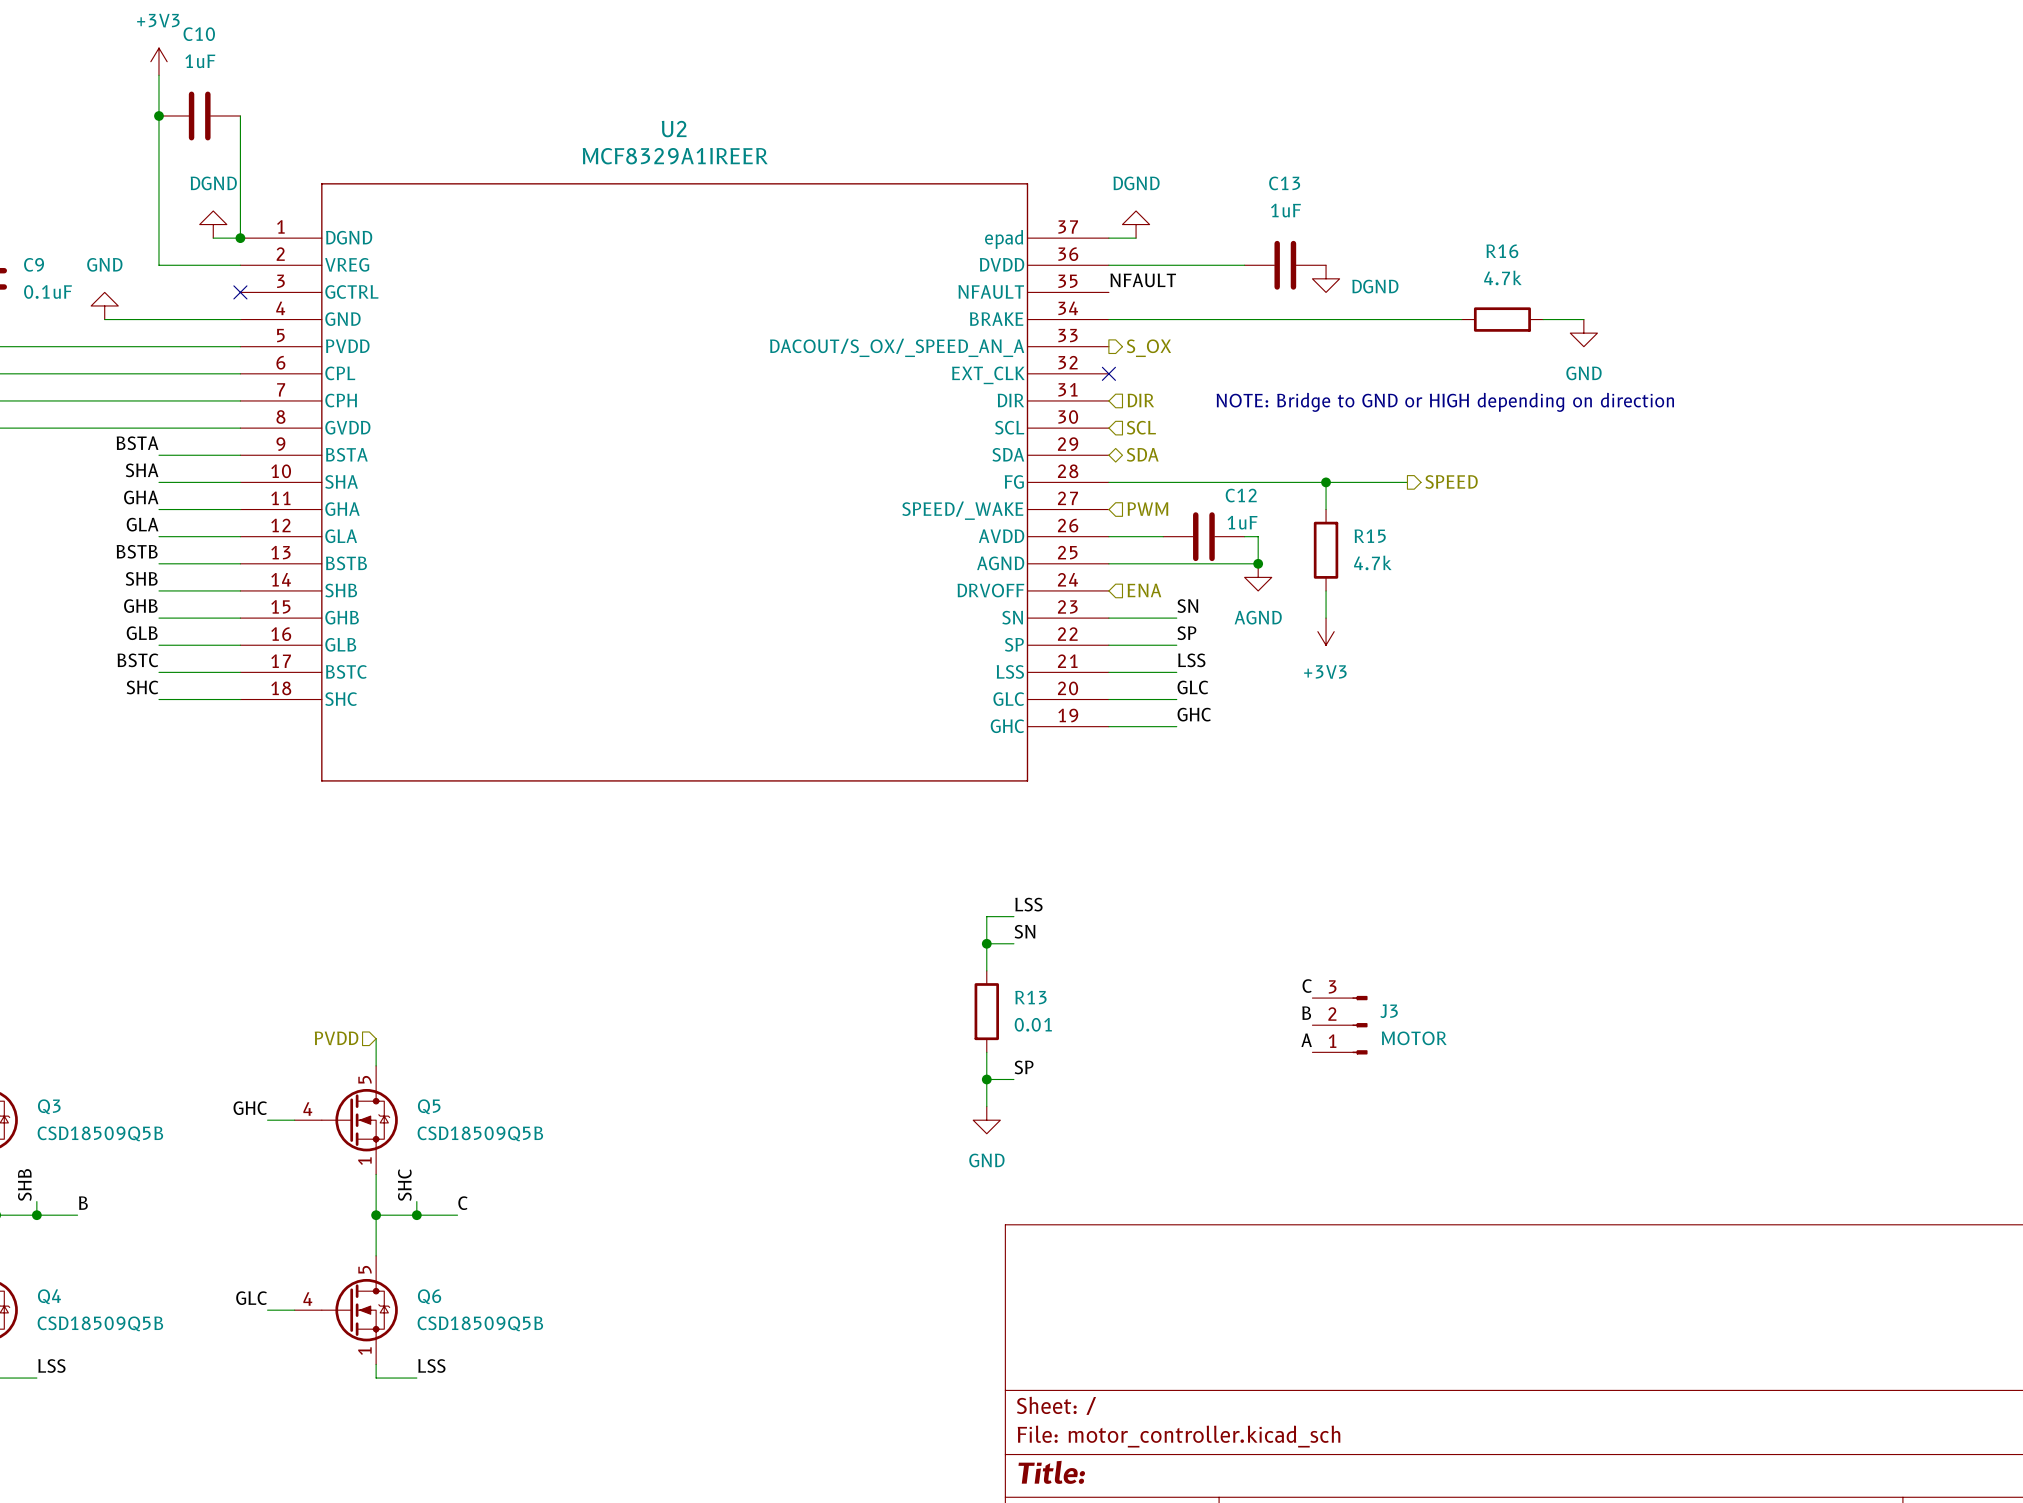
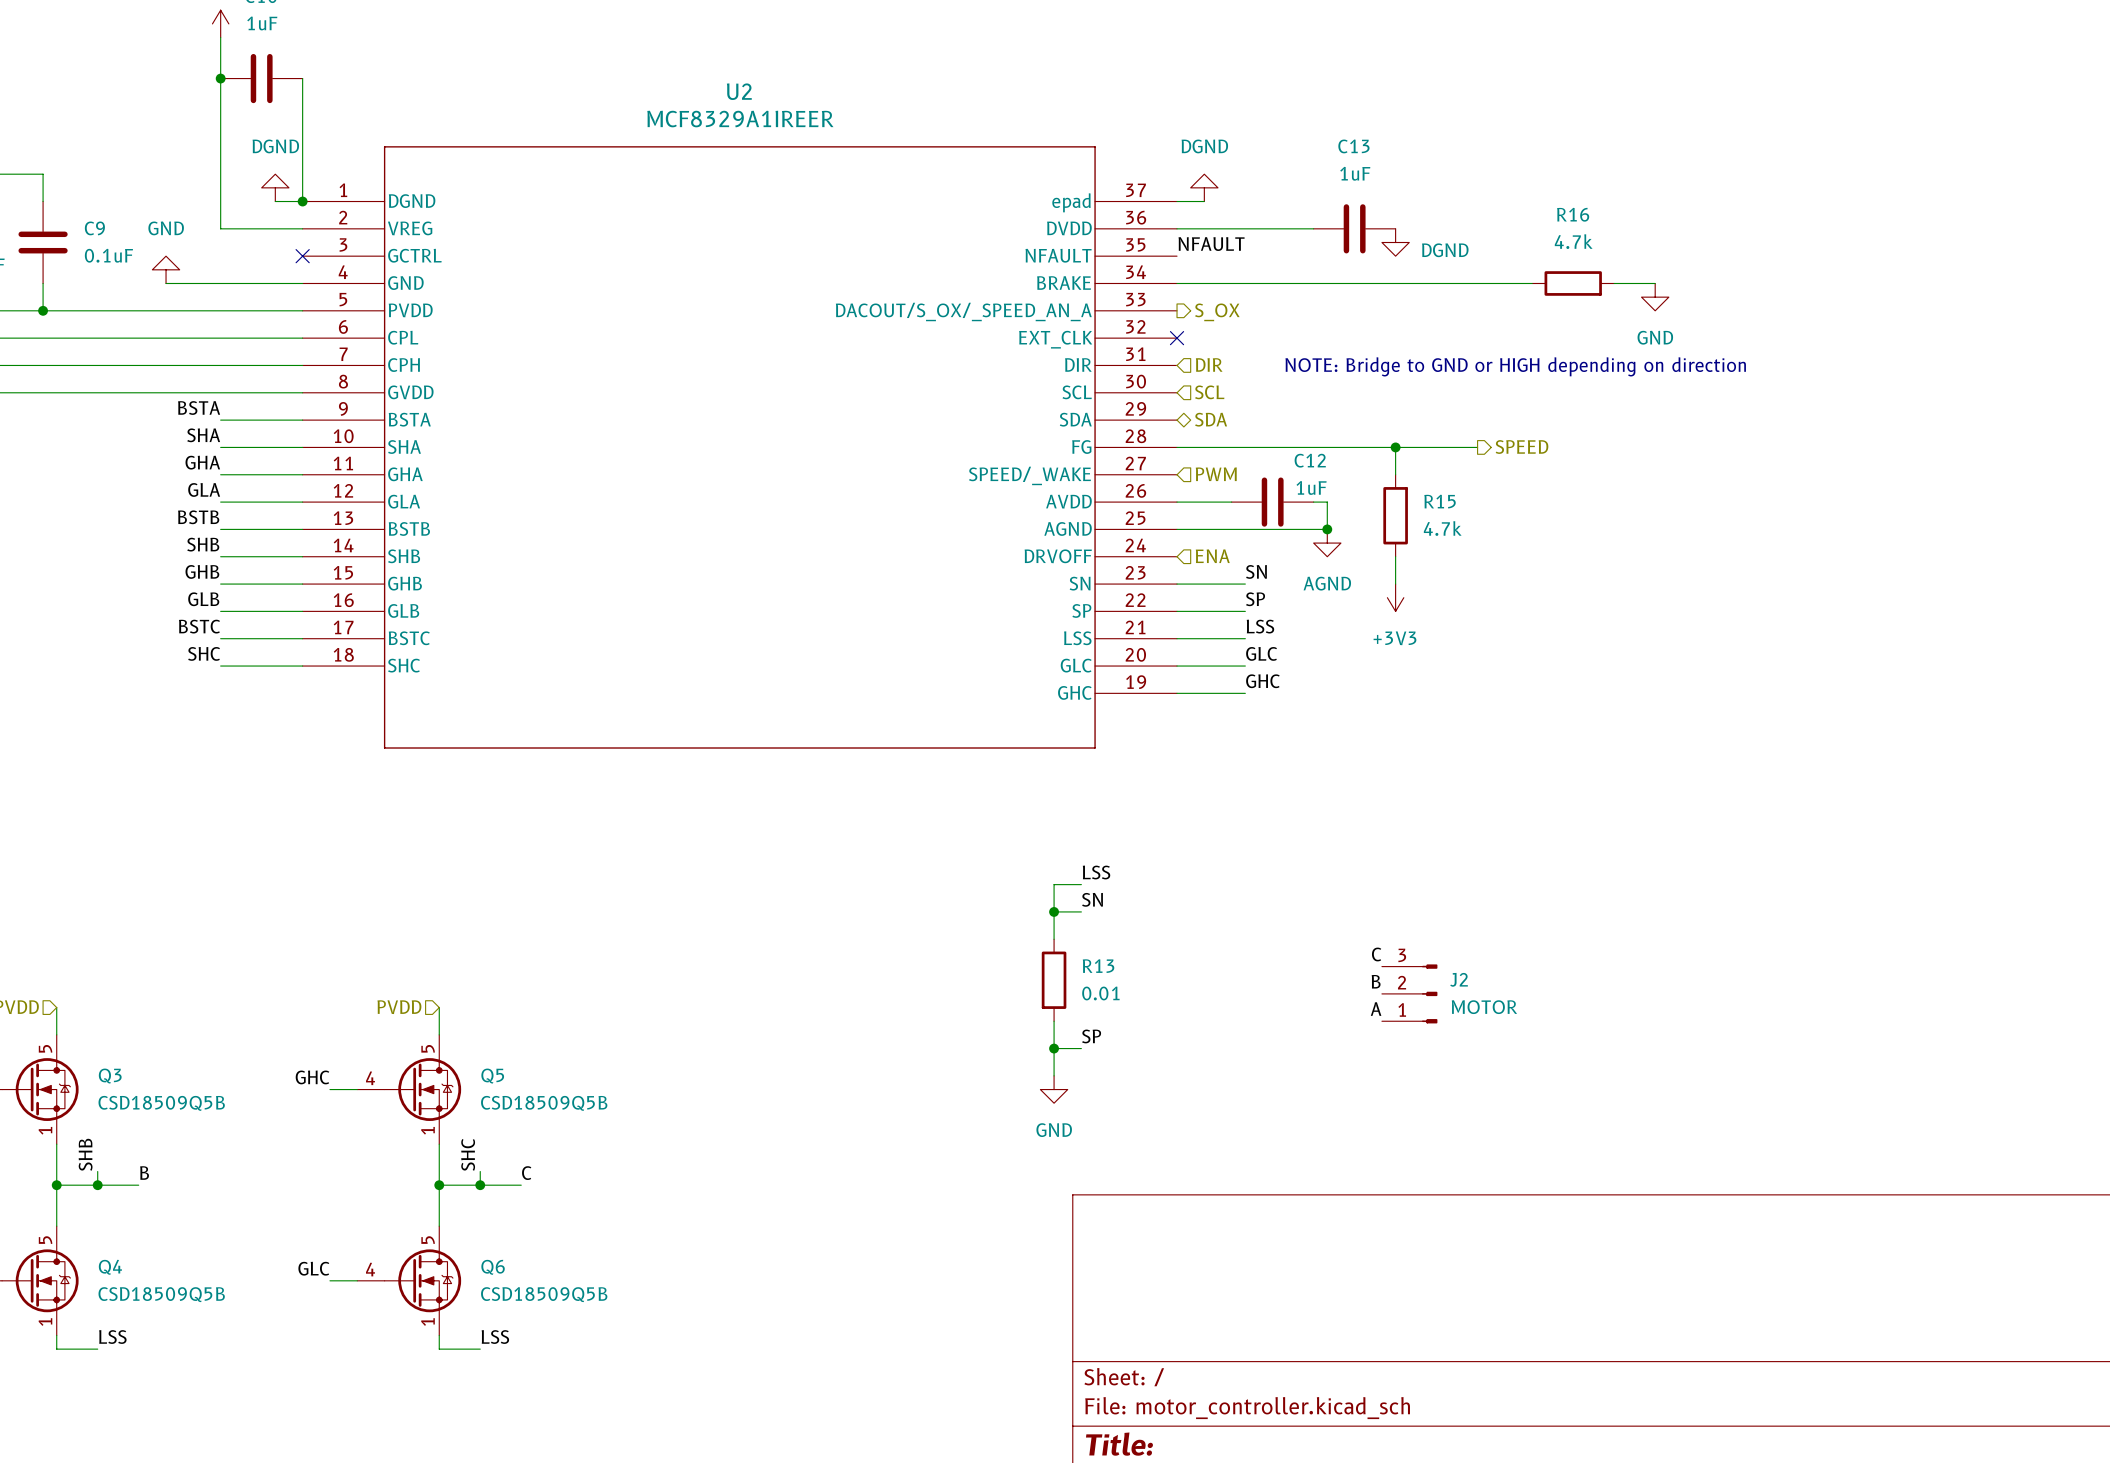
J3 name: J3 (1389, 1011) -> J2 (1459, 979)

